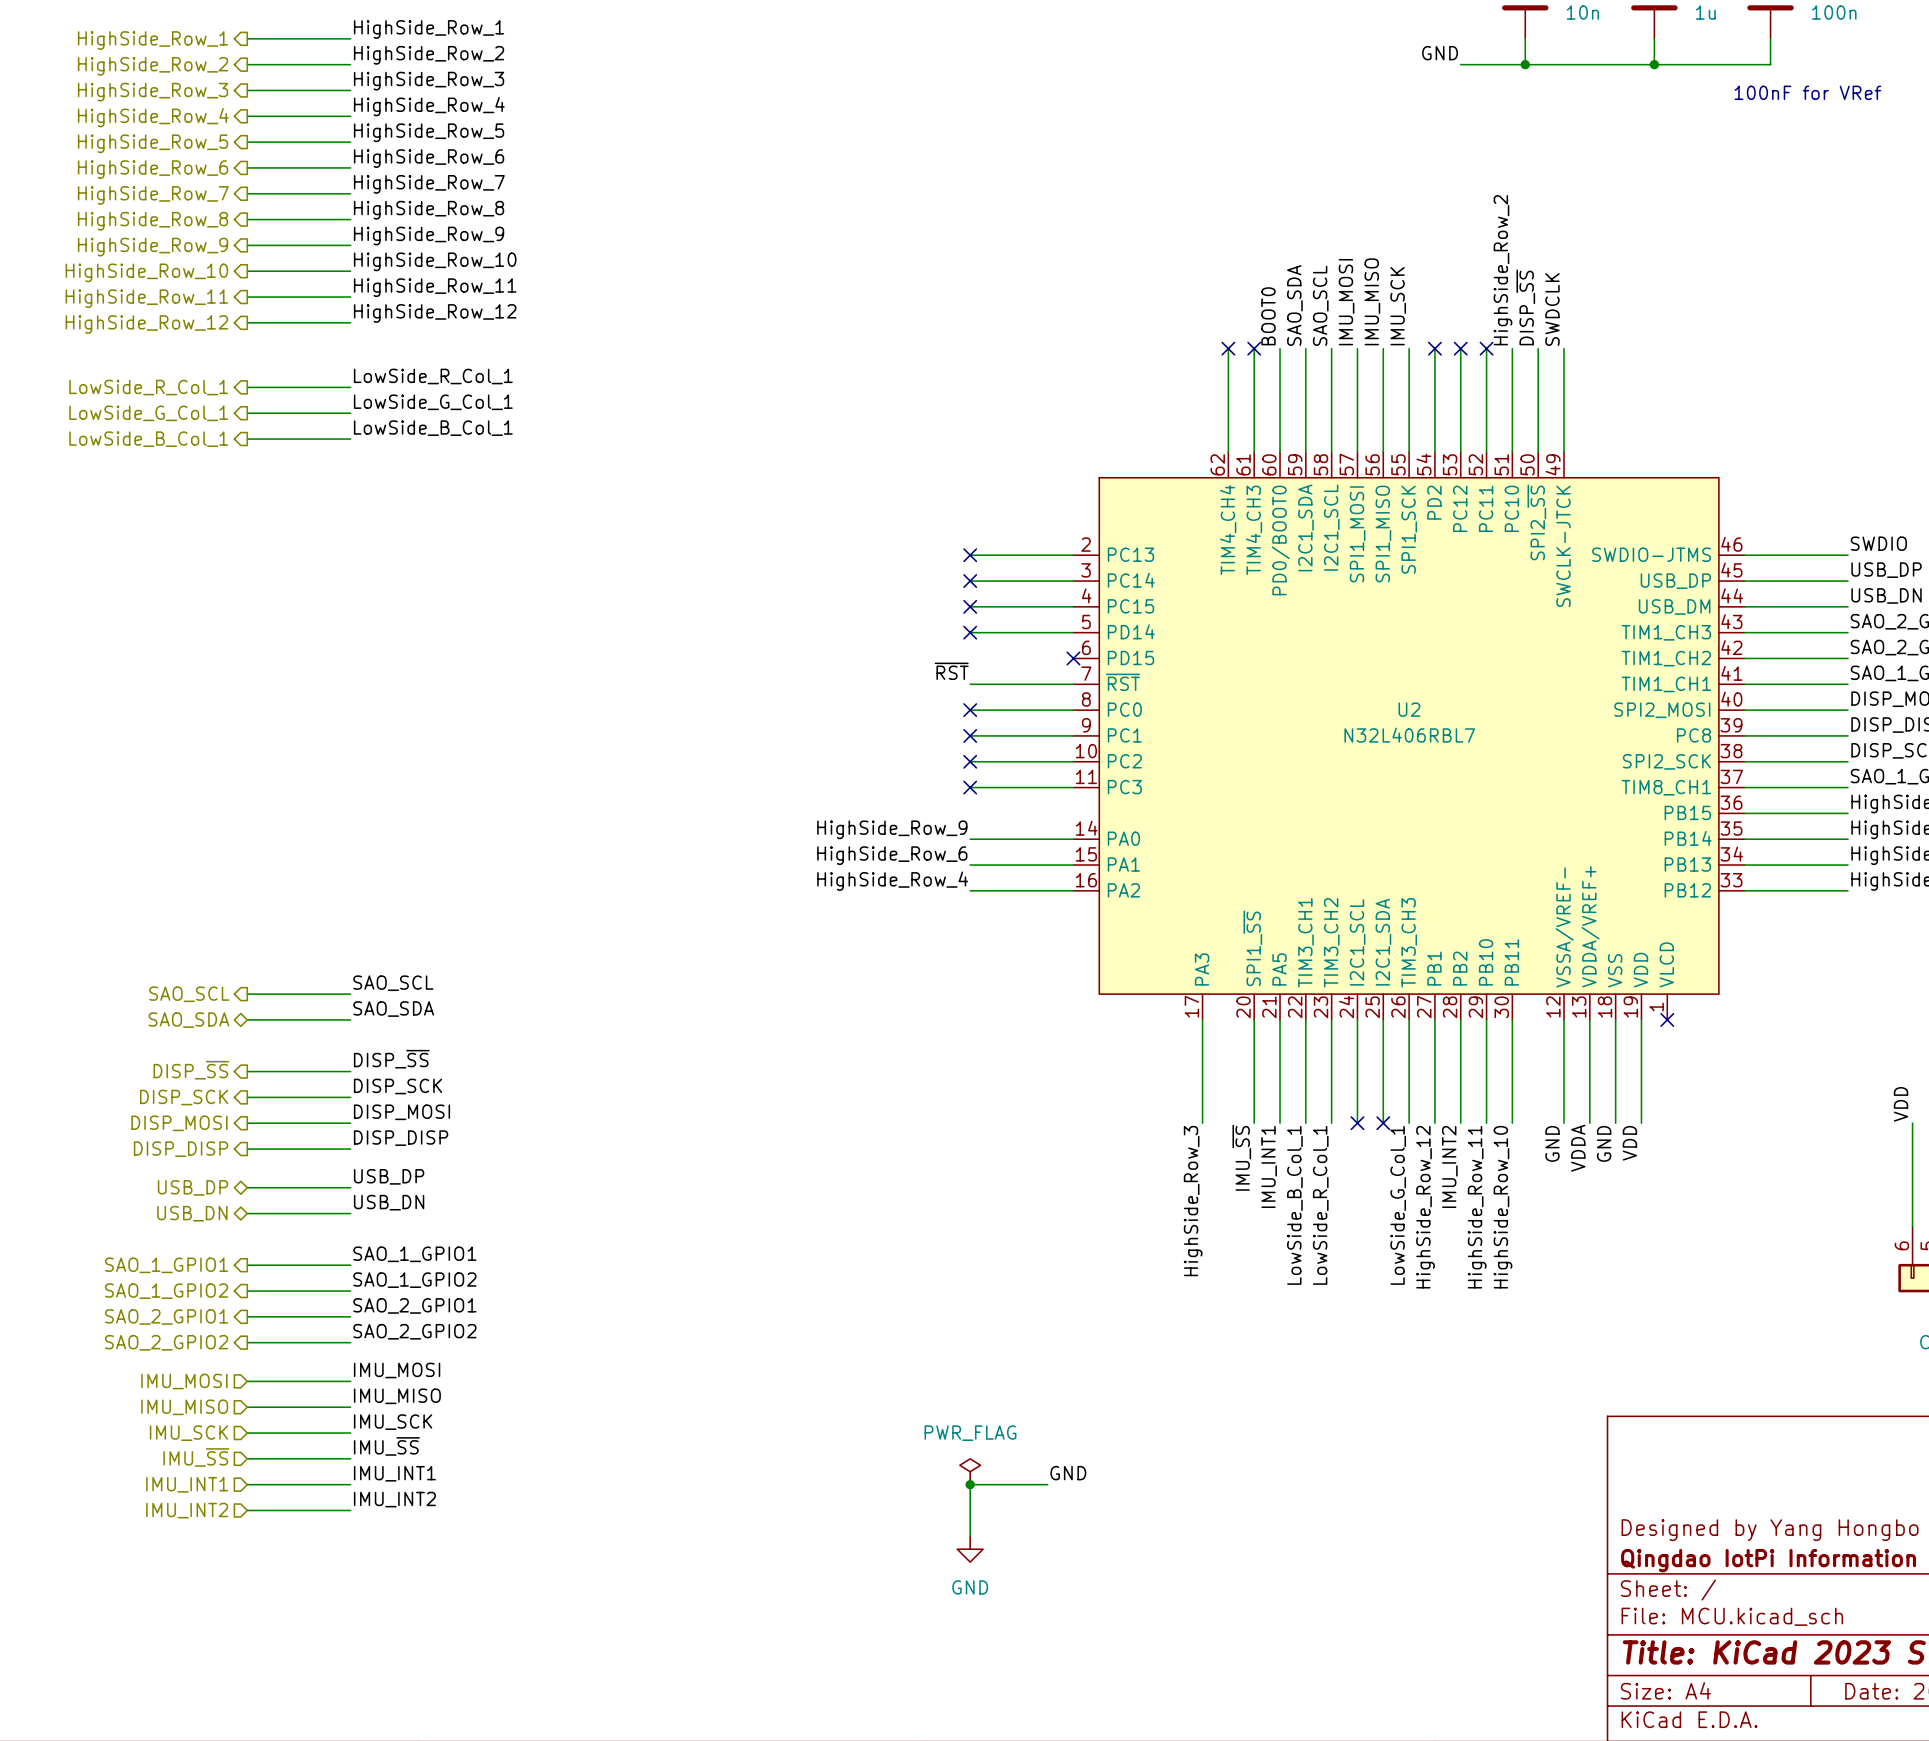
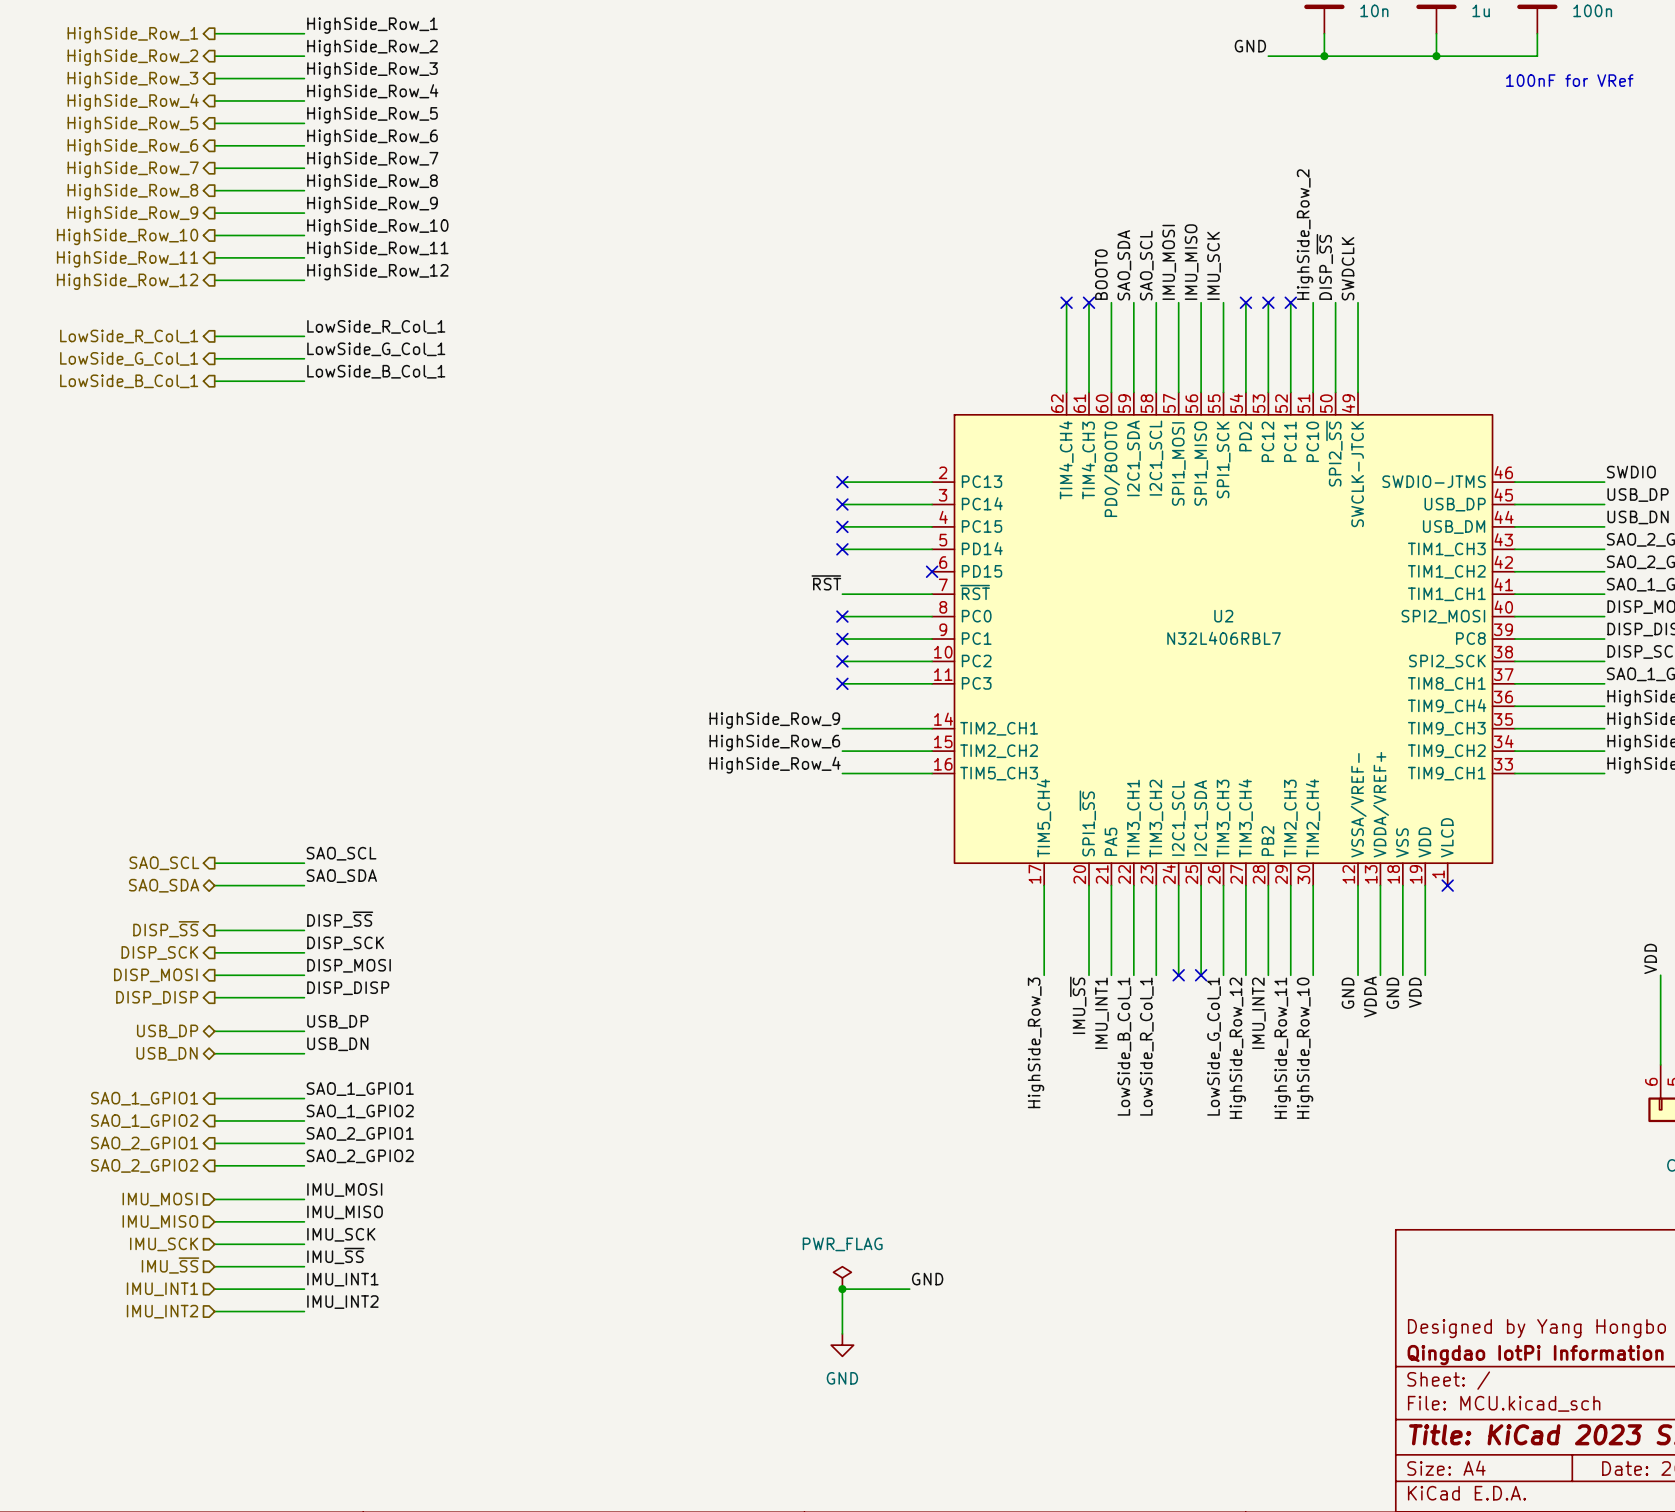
U2 symbol: [1073, 451, 1745, 1020] -> [932, 392, 1515, 886]

